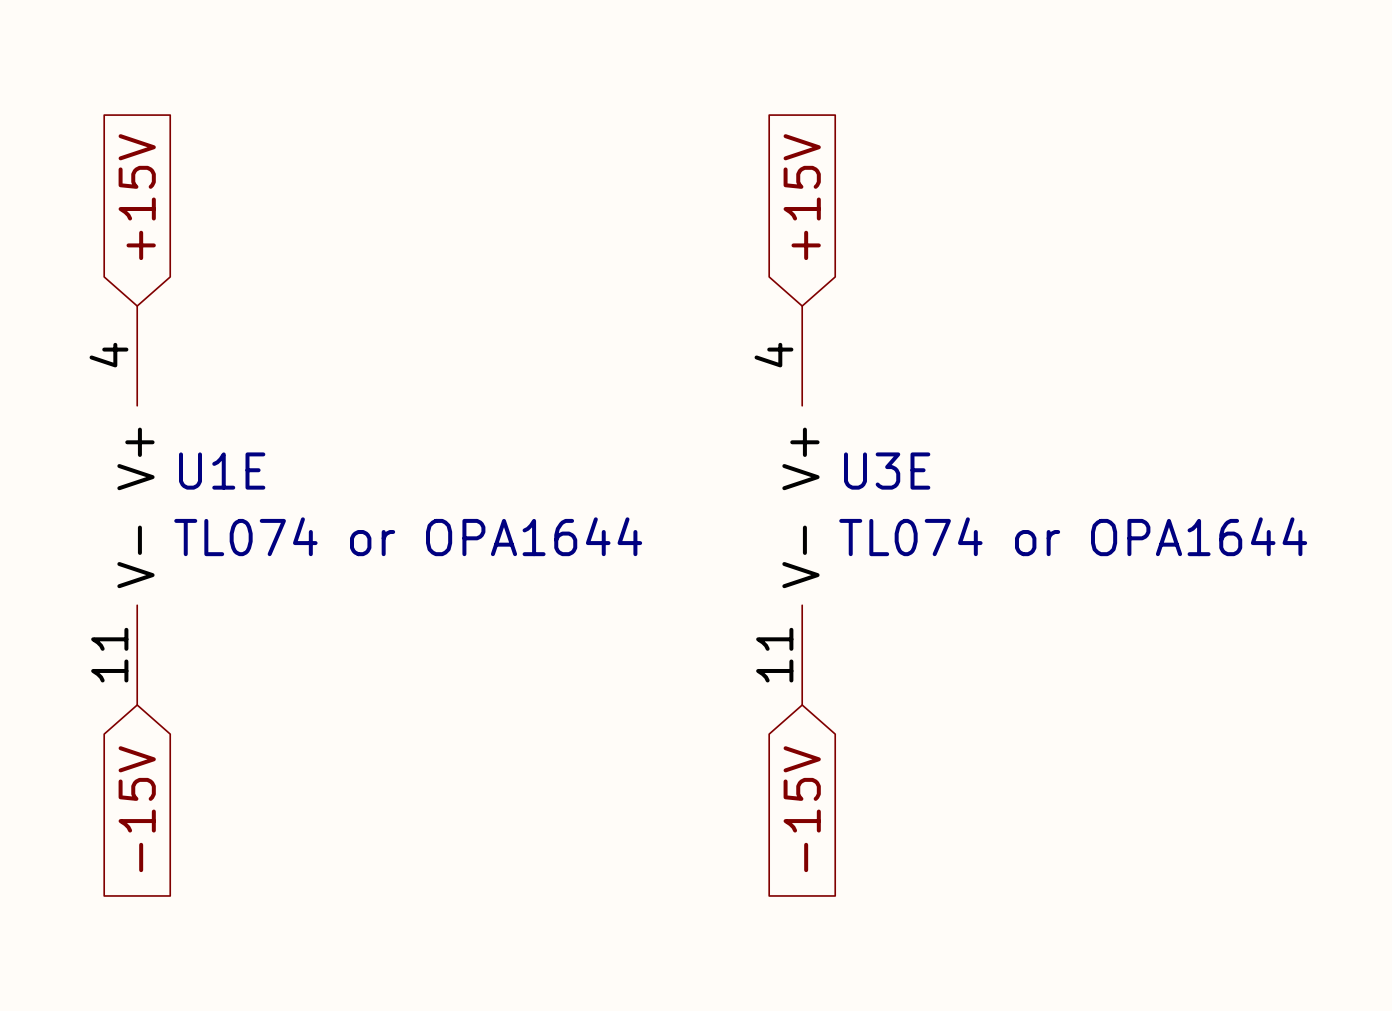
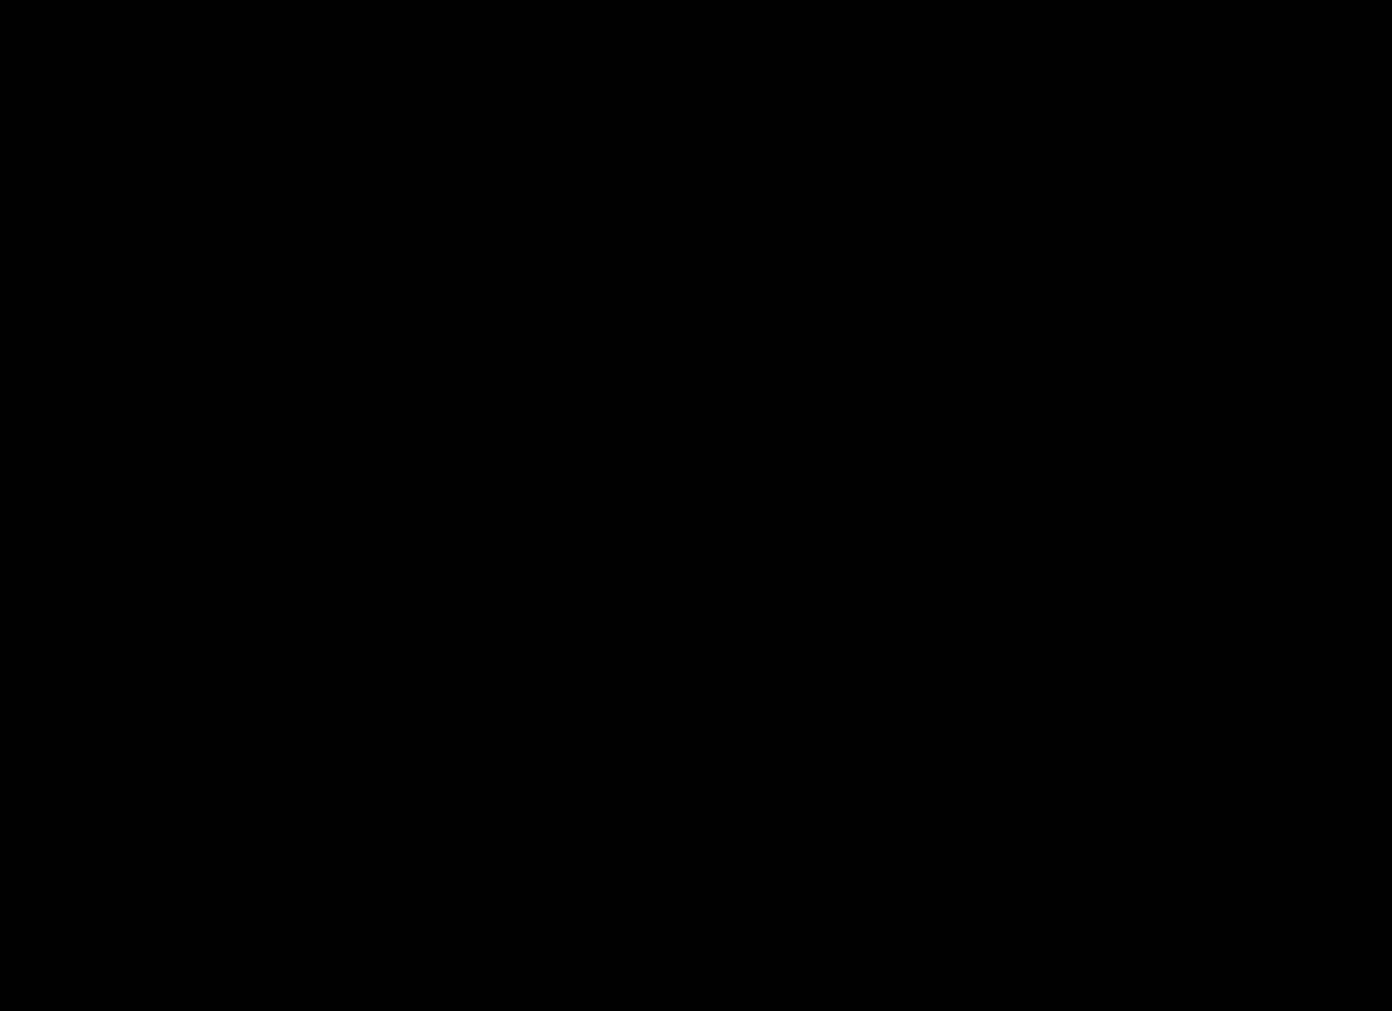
global label: +15V (137, 197) -> none
global label: +15V (802, 197) -> none
U1E: TL074 or OPA1644 (137, 505) -> none
U3E: TL074 or OPA1644 (802, 505) -> none
global label: -15V (137, 809) -> none
global label: -15V (802, 809) -> none

